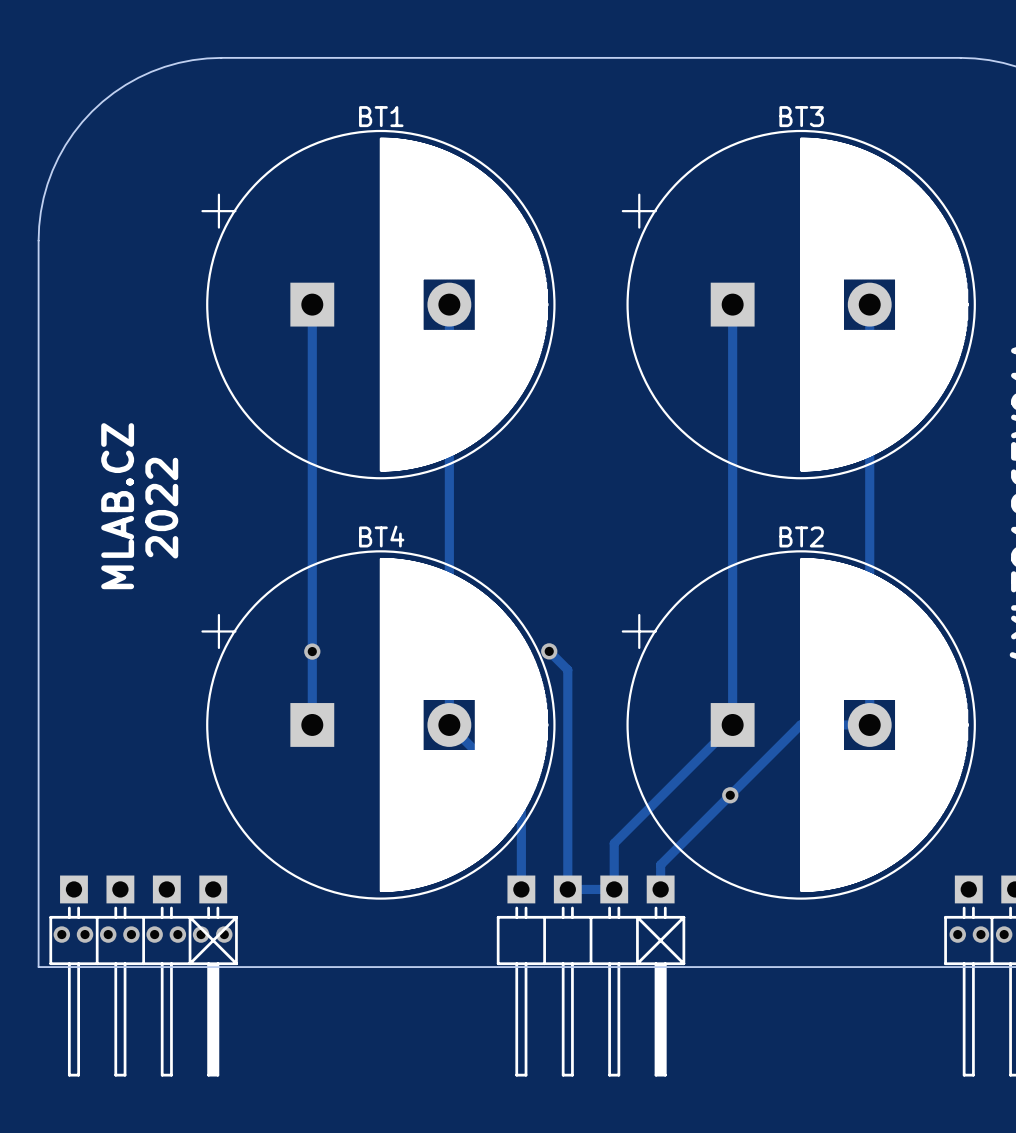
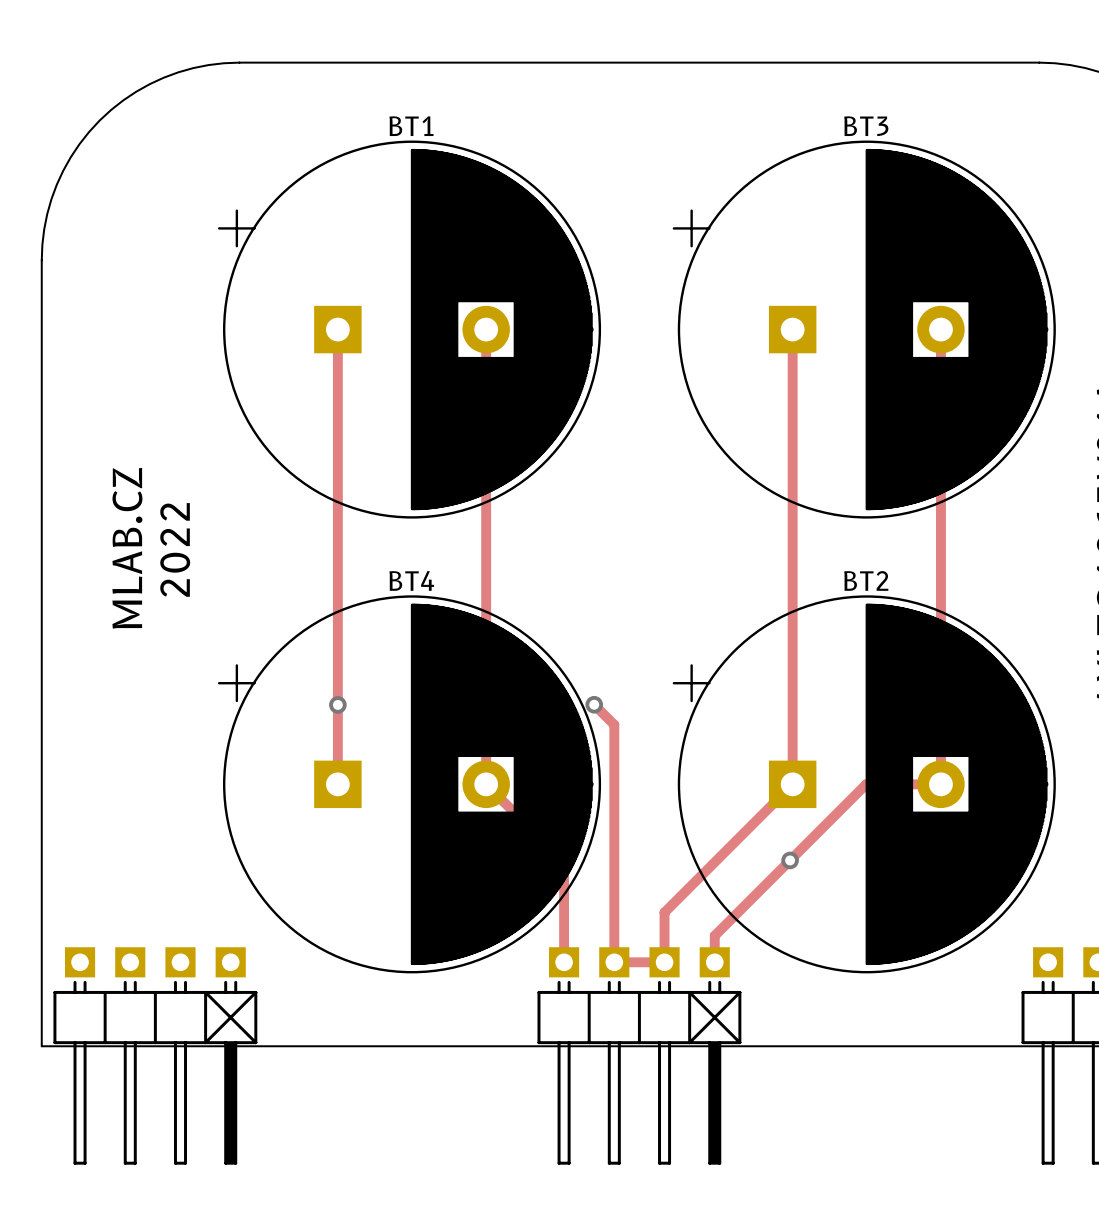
via: (61, 934) -> none
via: (85, 934) -> none
via: (108, 934) -> none
via: (131, 934) -> none
via: (154, 934) -> none
via: (177, 934) -> none
via: (201, 934) -> none
via: (224, 934) -> none
via: (957, 934) -> none
via: (980, 934) -> none
via: (1004, 934) -> none

